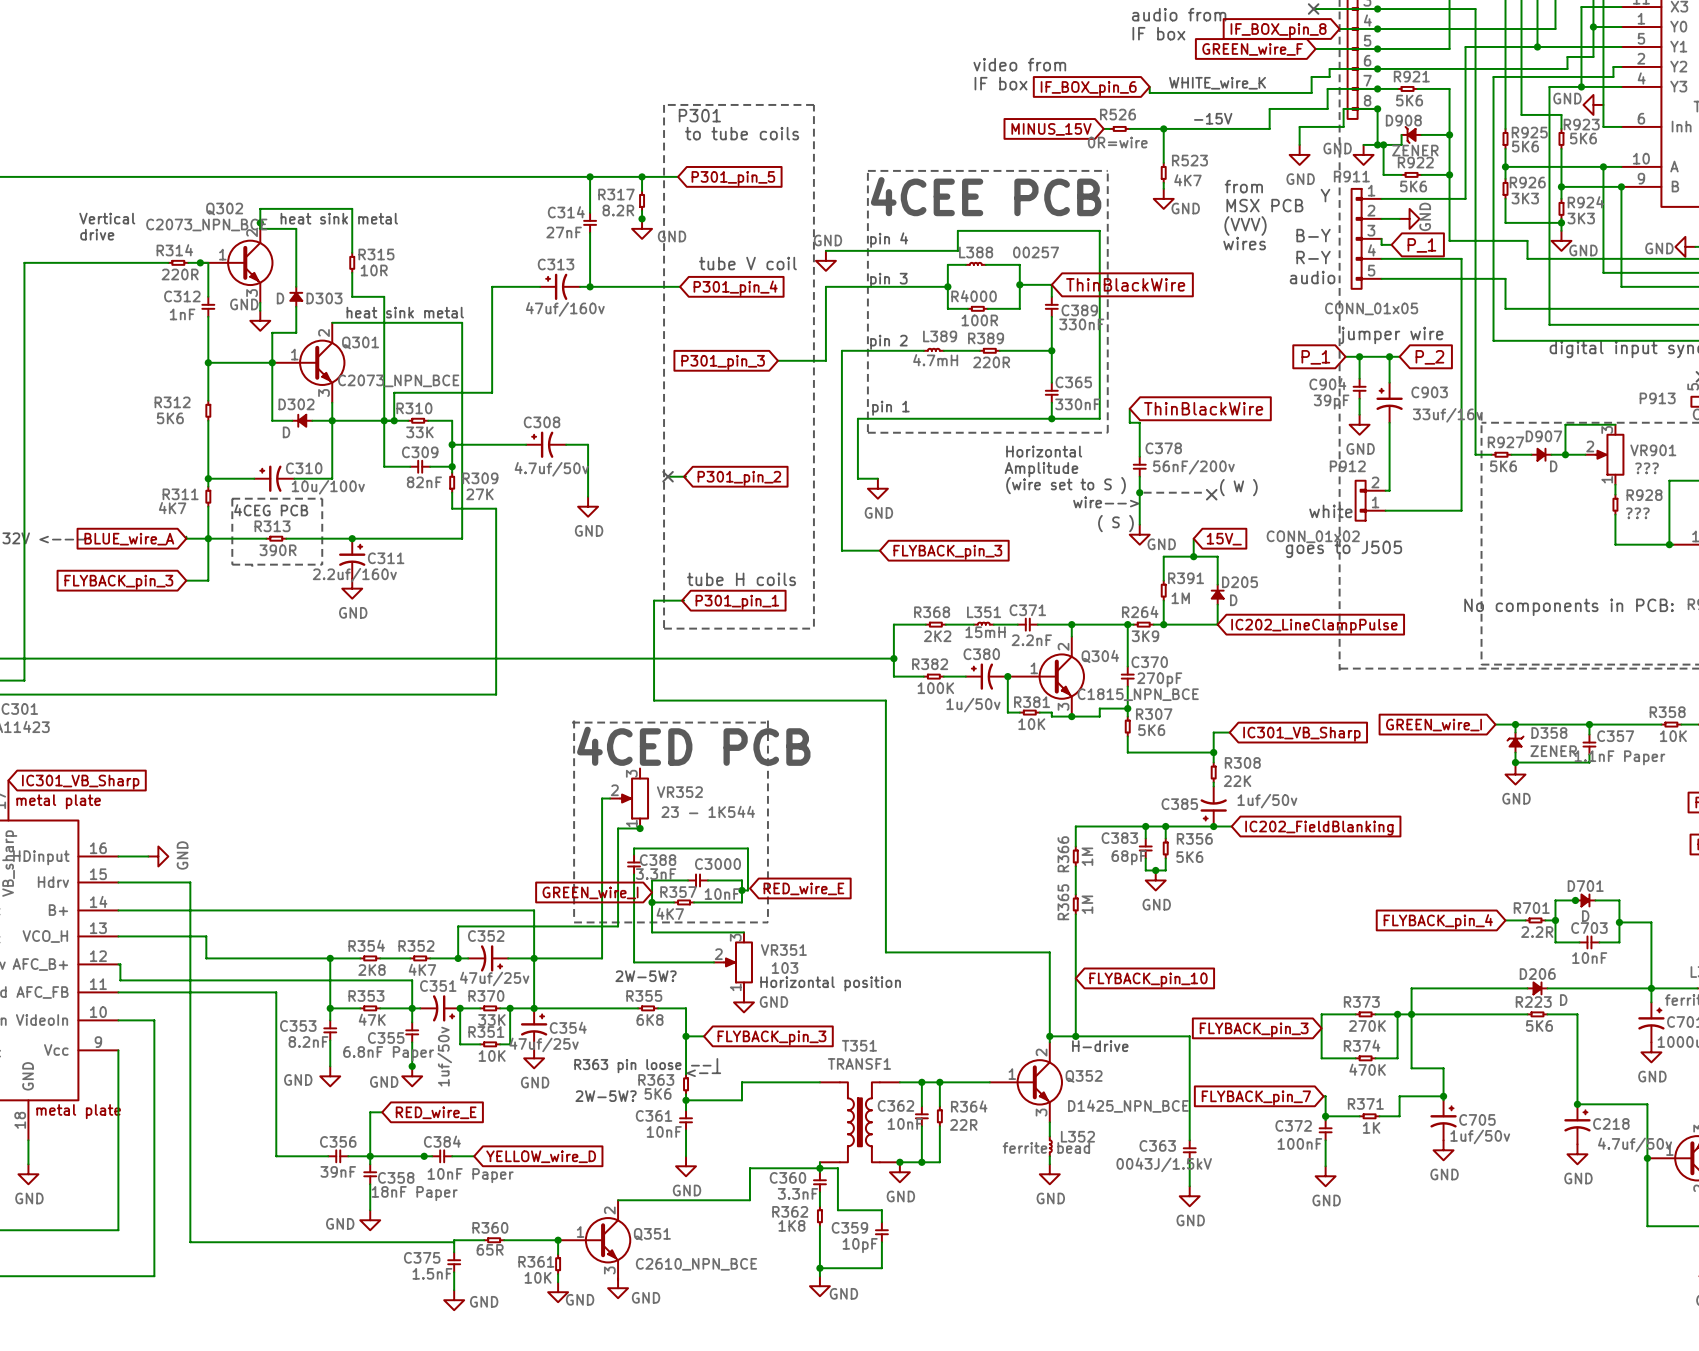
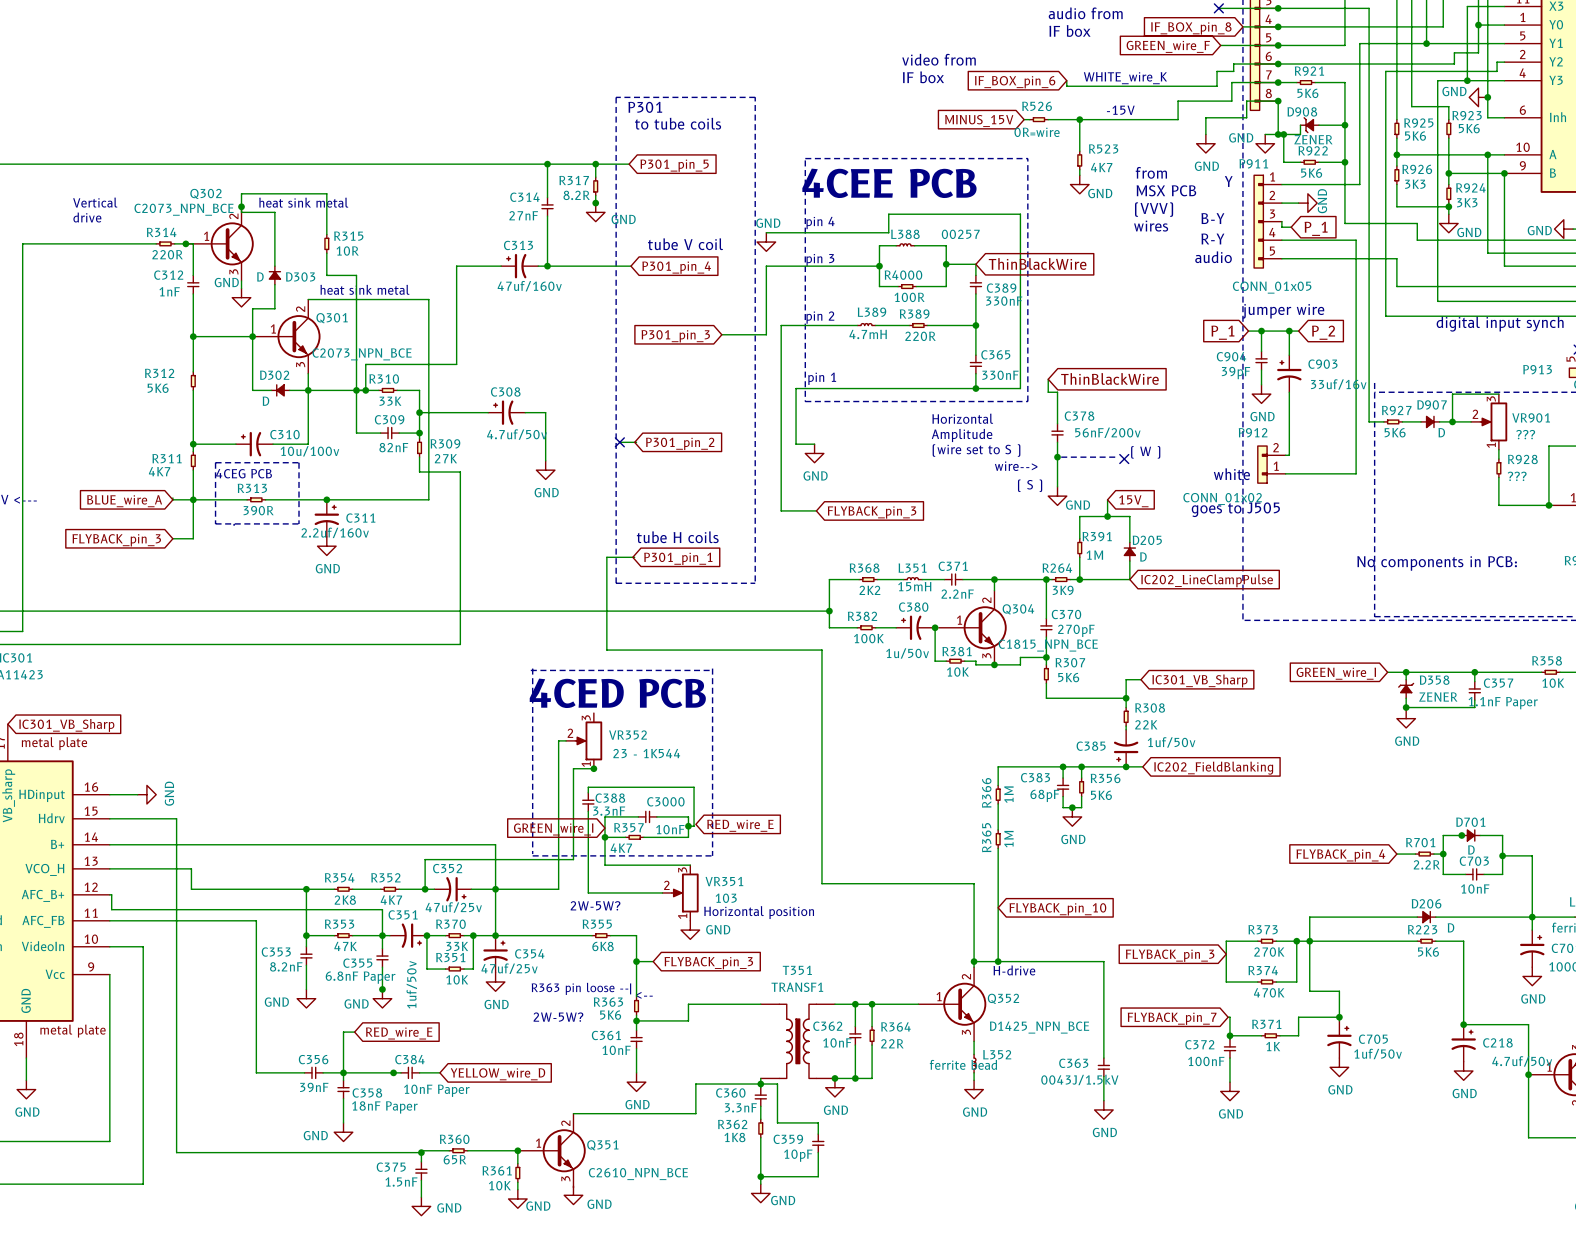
junction: none -> (1487, 97)
junction: none -> (421, 1152)

